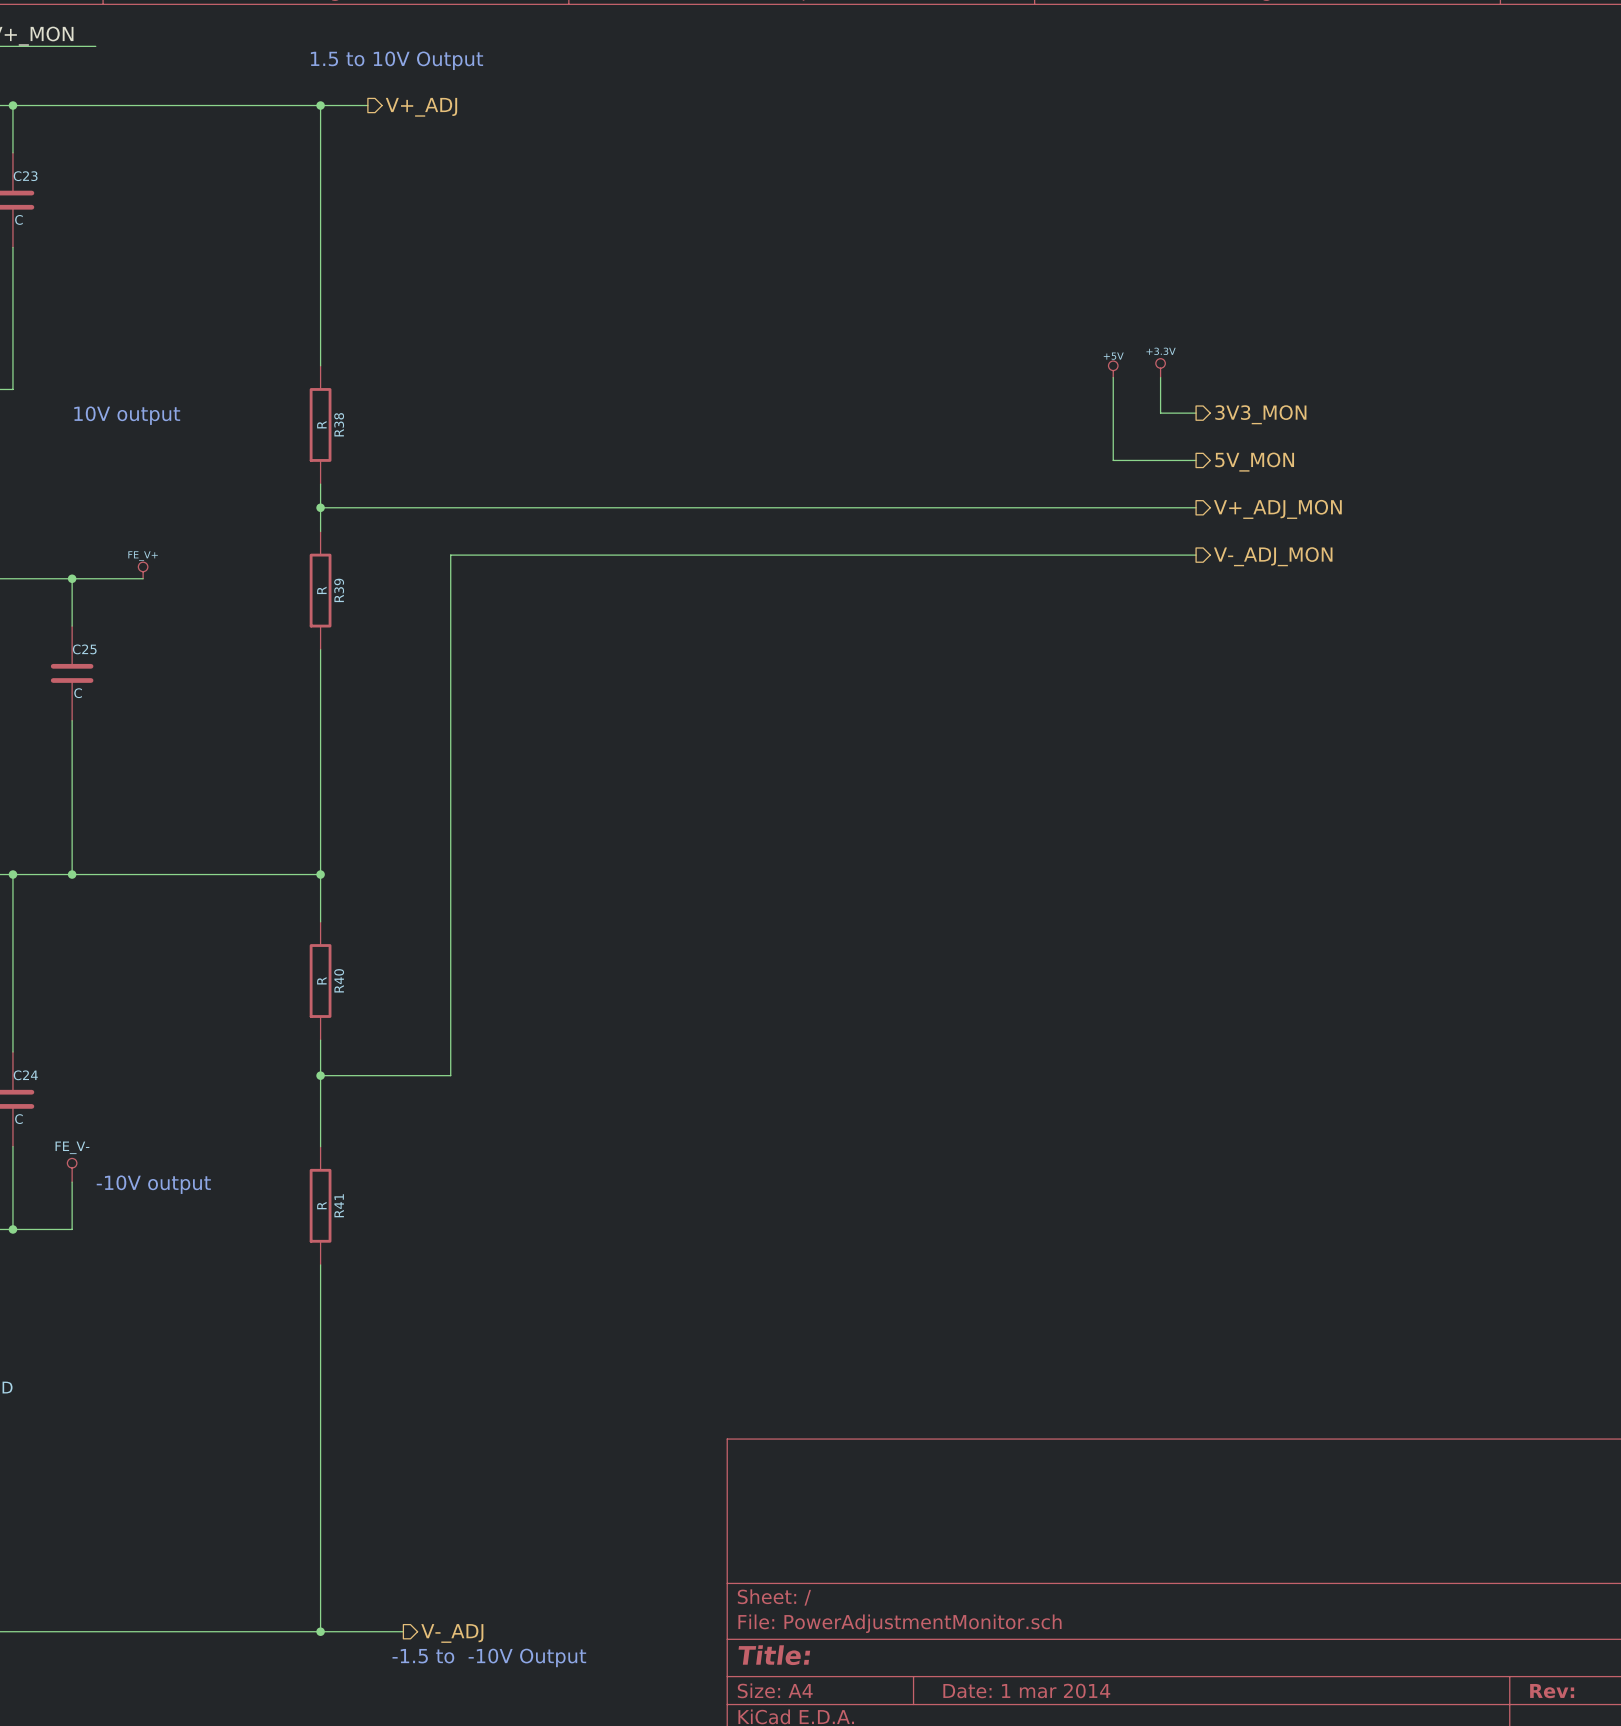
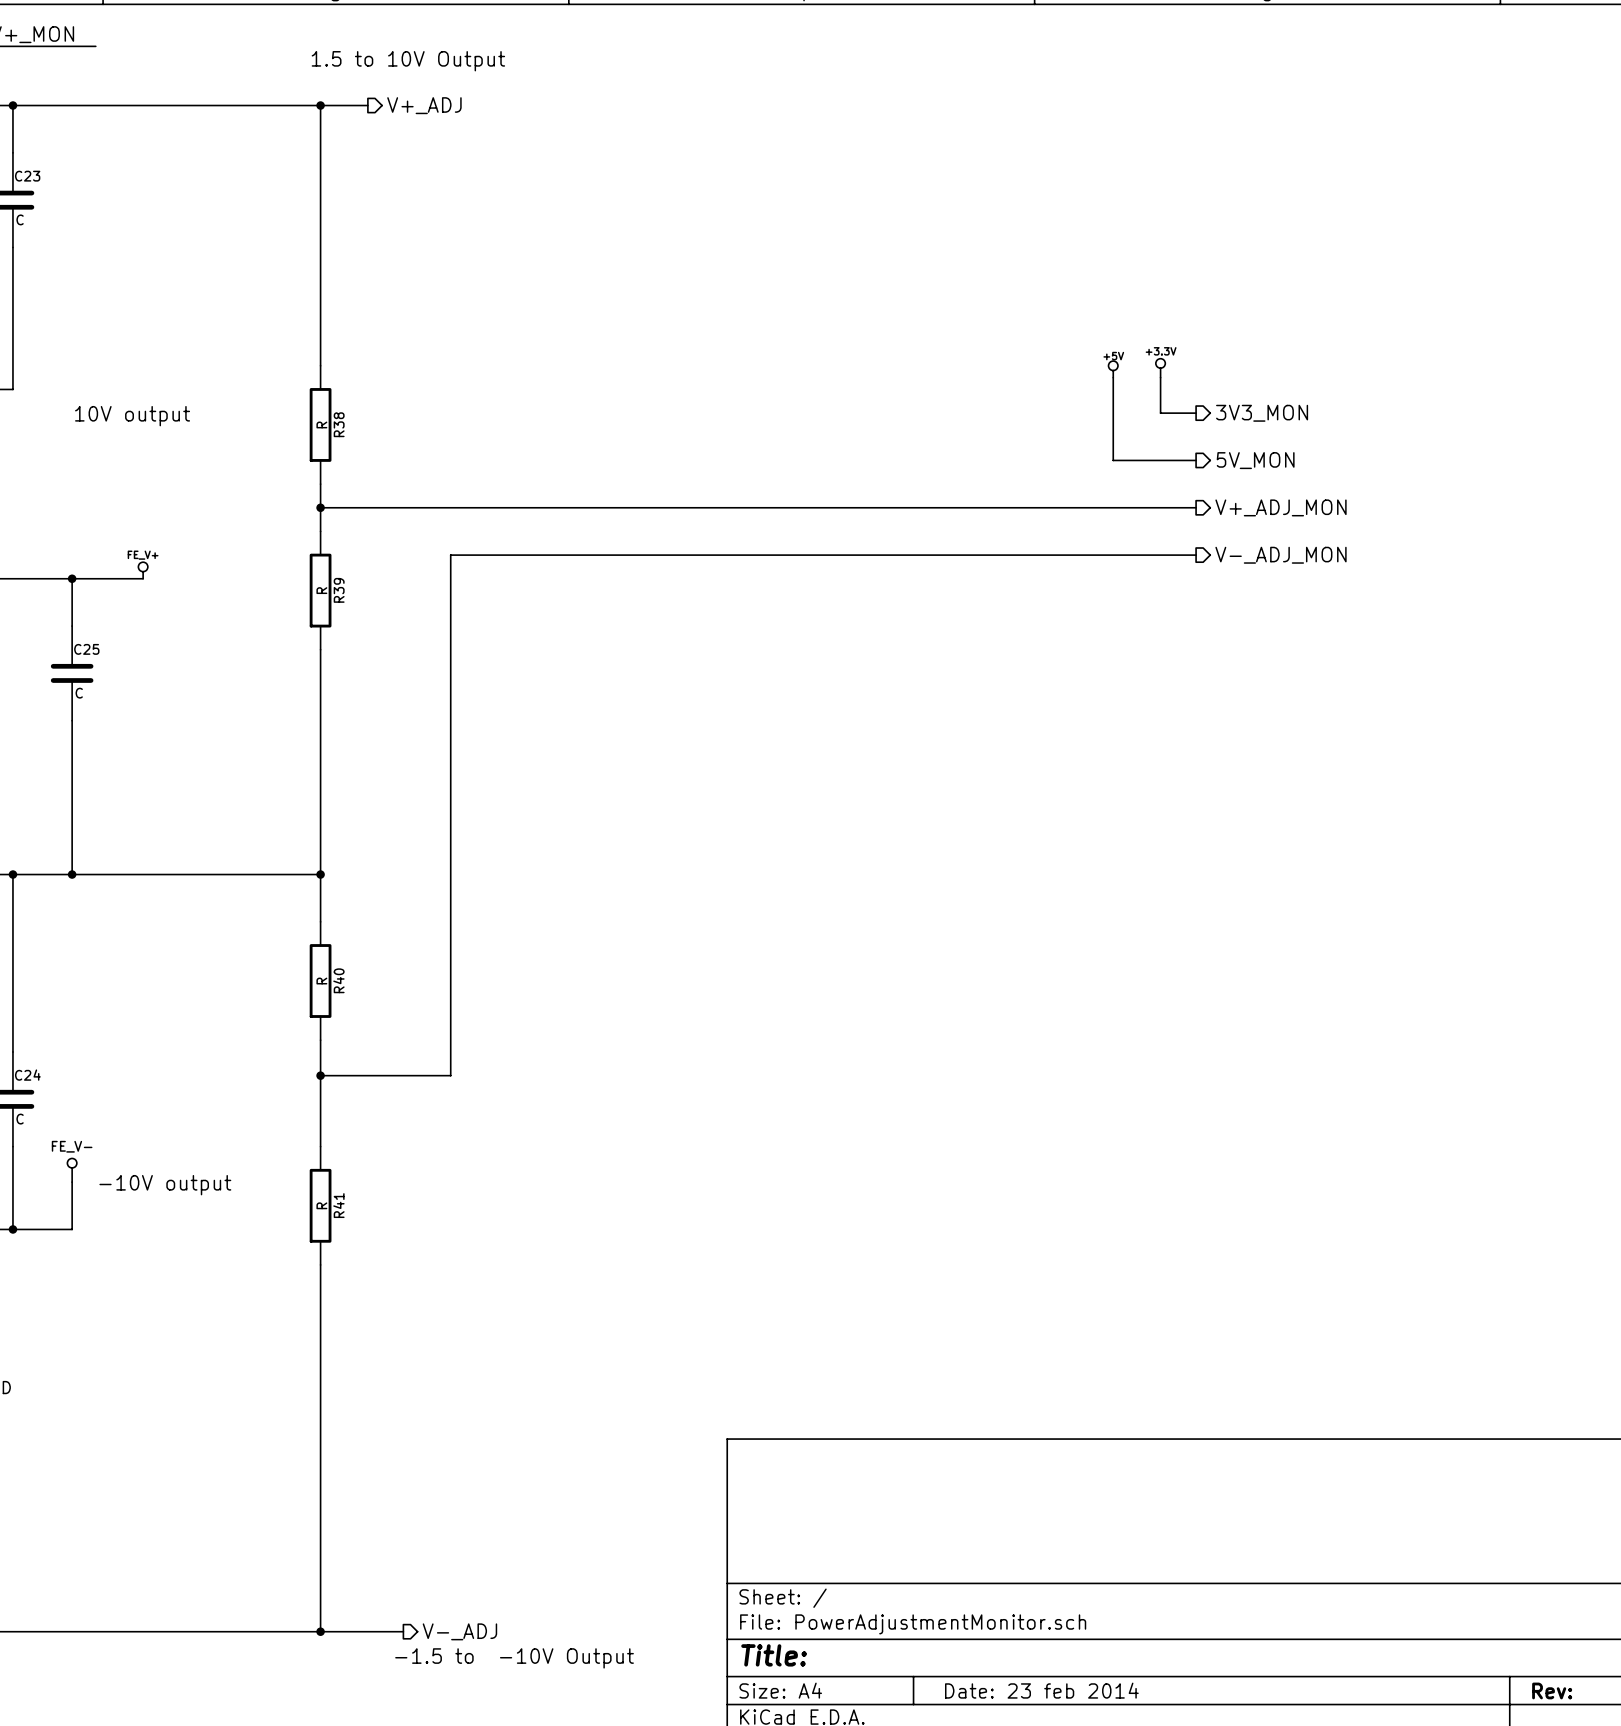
title block: Date: 1 mar 2014 (1026, 1690) -> Date: 23 feb 2014 (1041, 1690)

